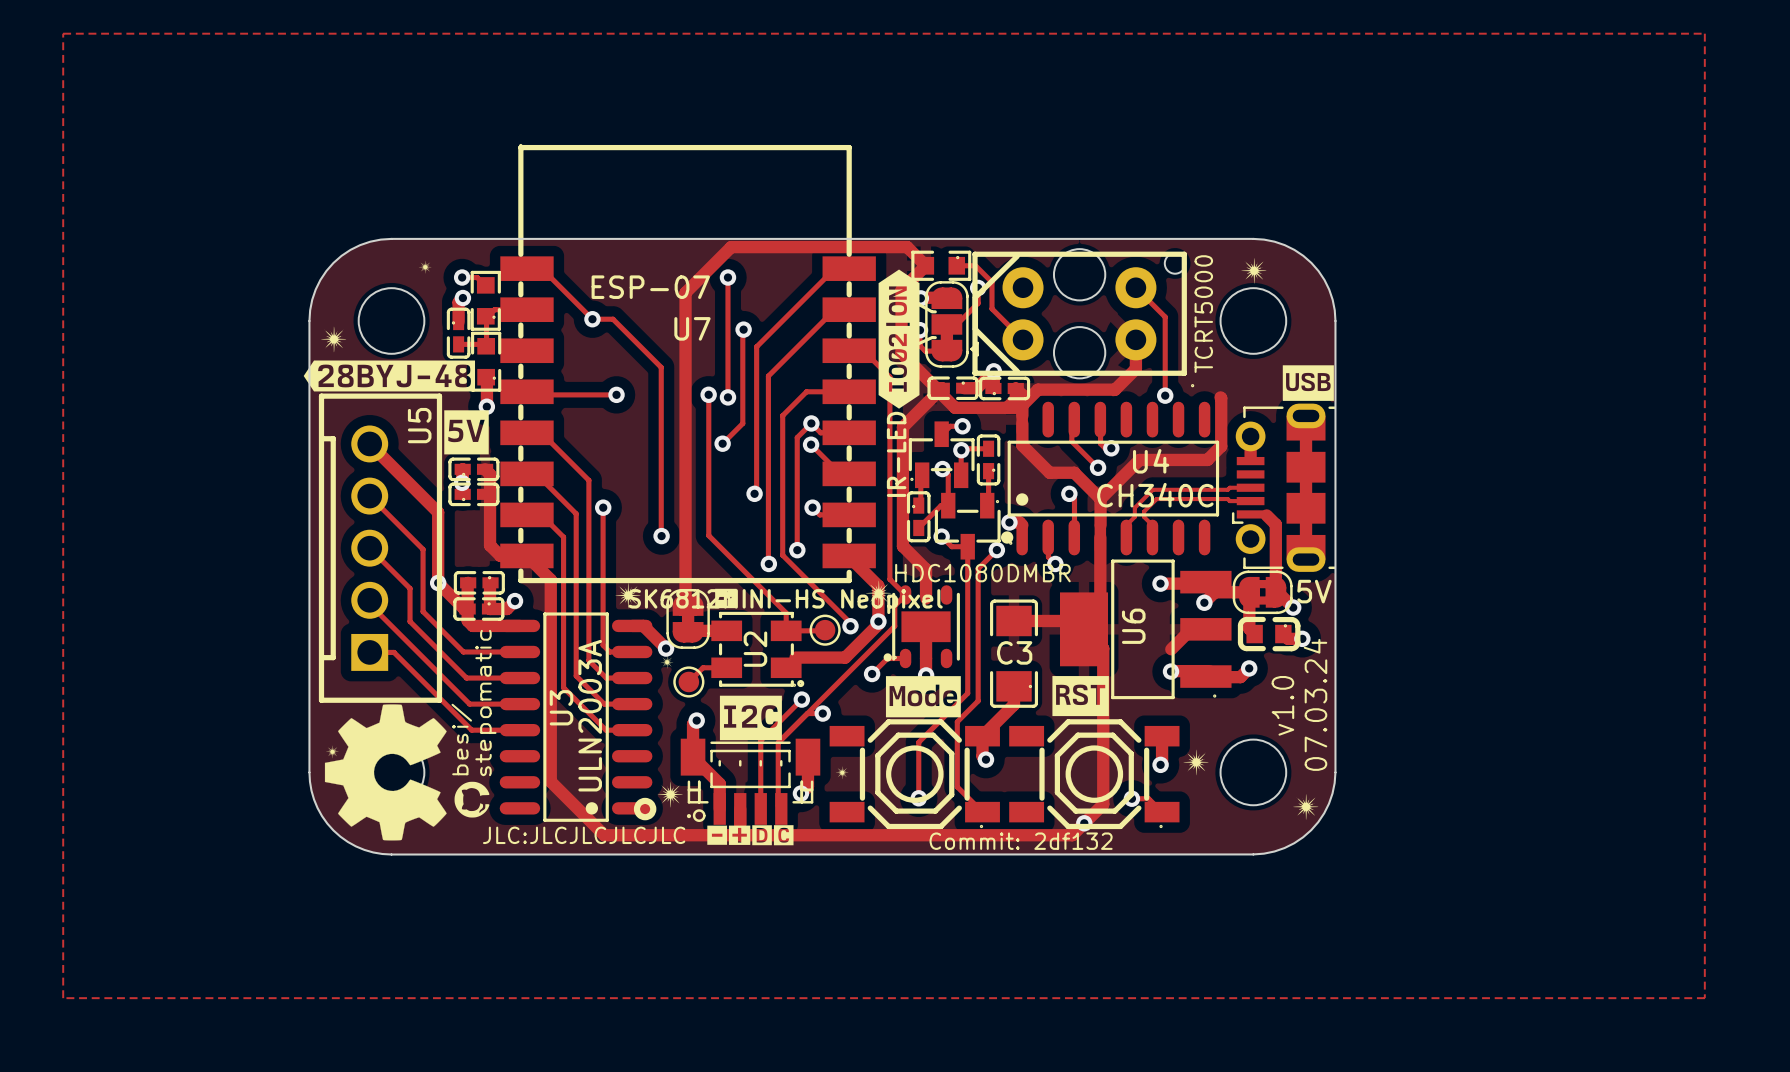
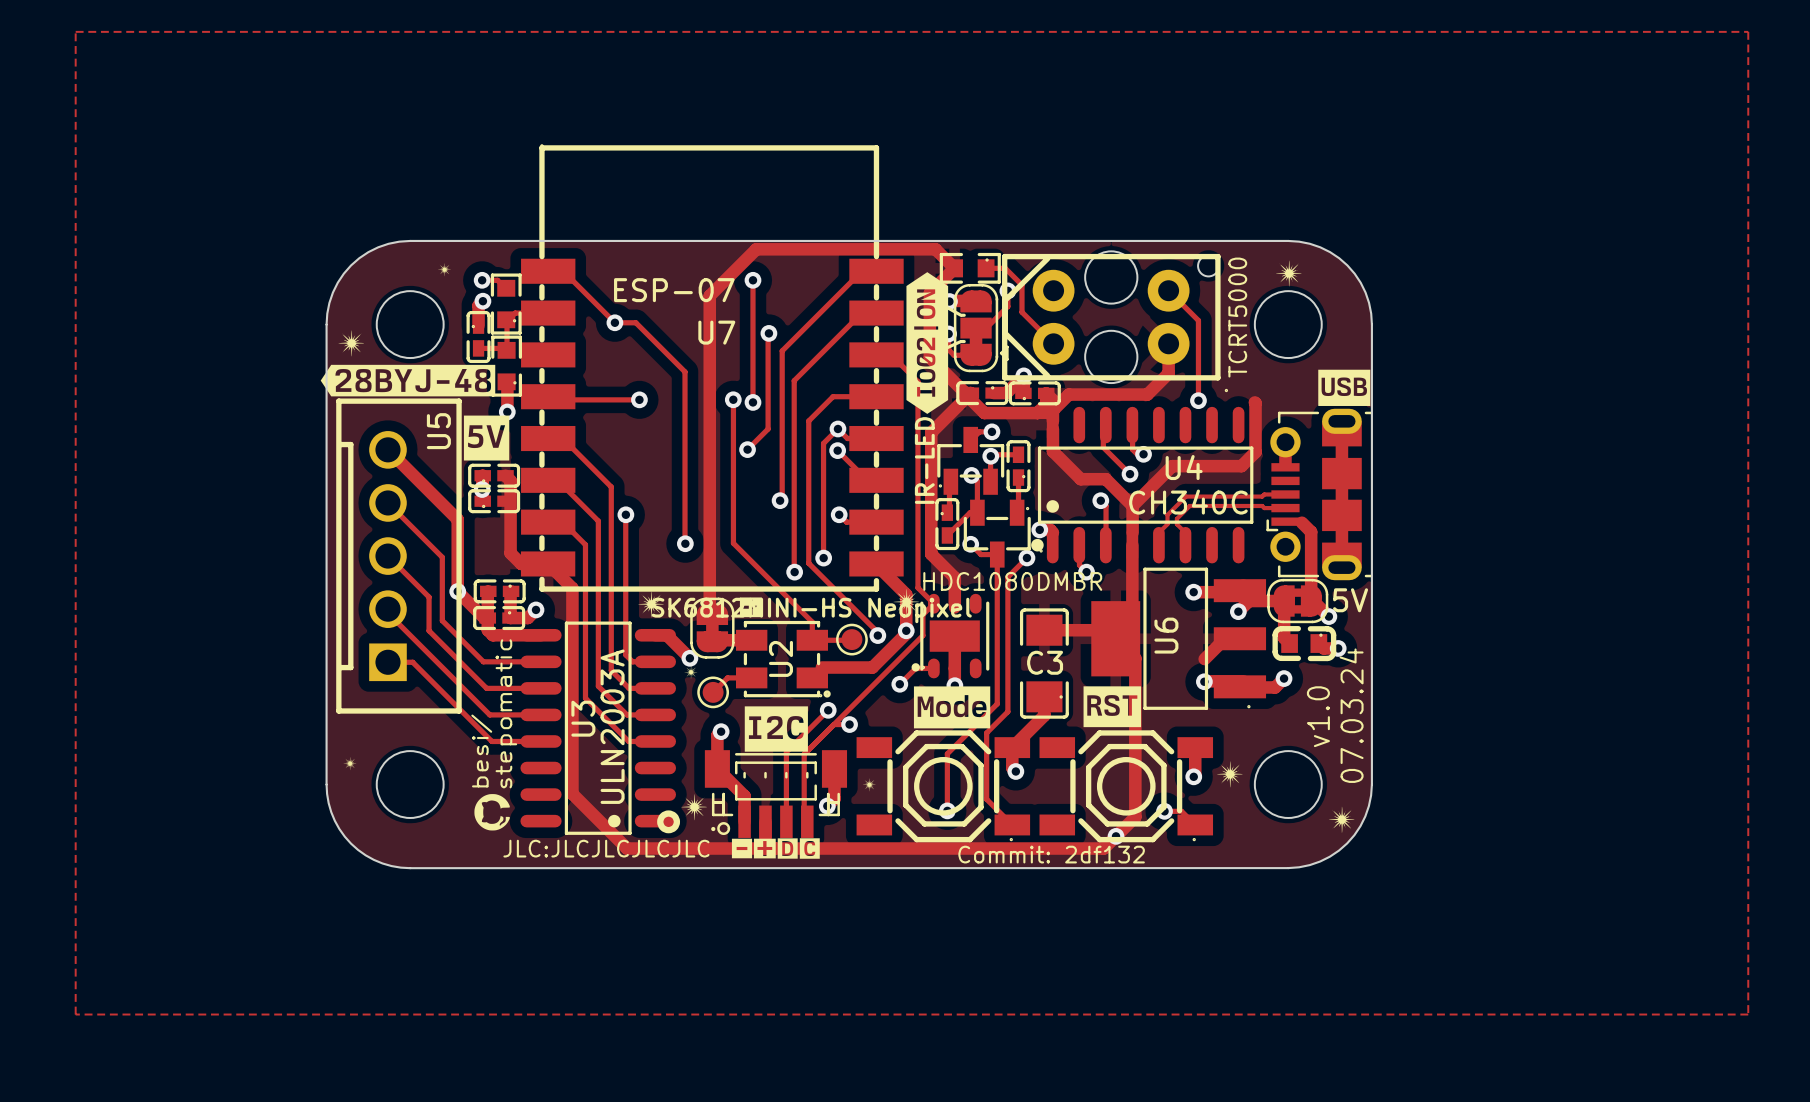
drawing: [324, 704, 447, 841] -> none

